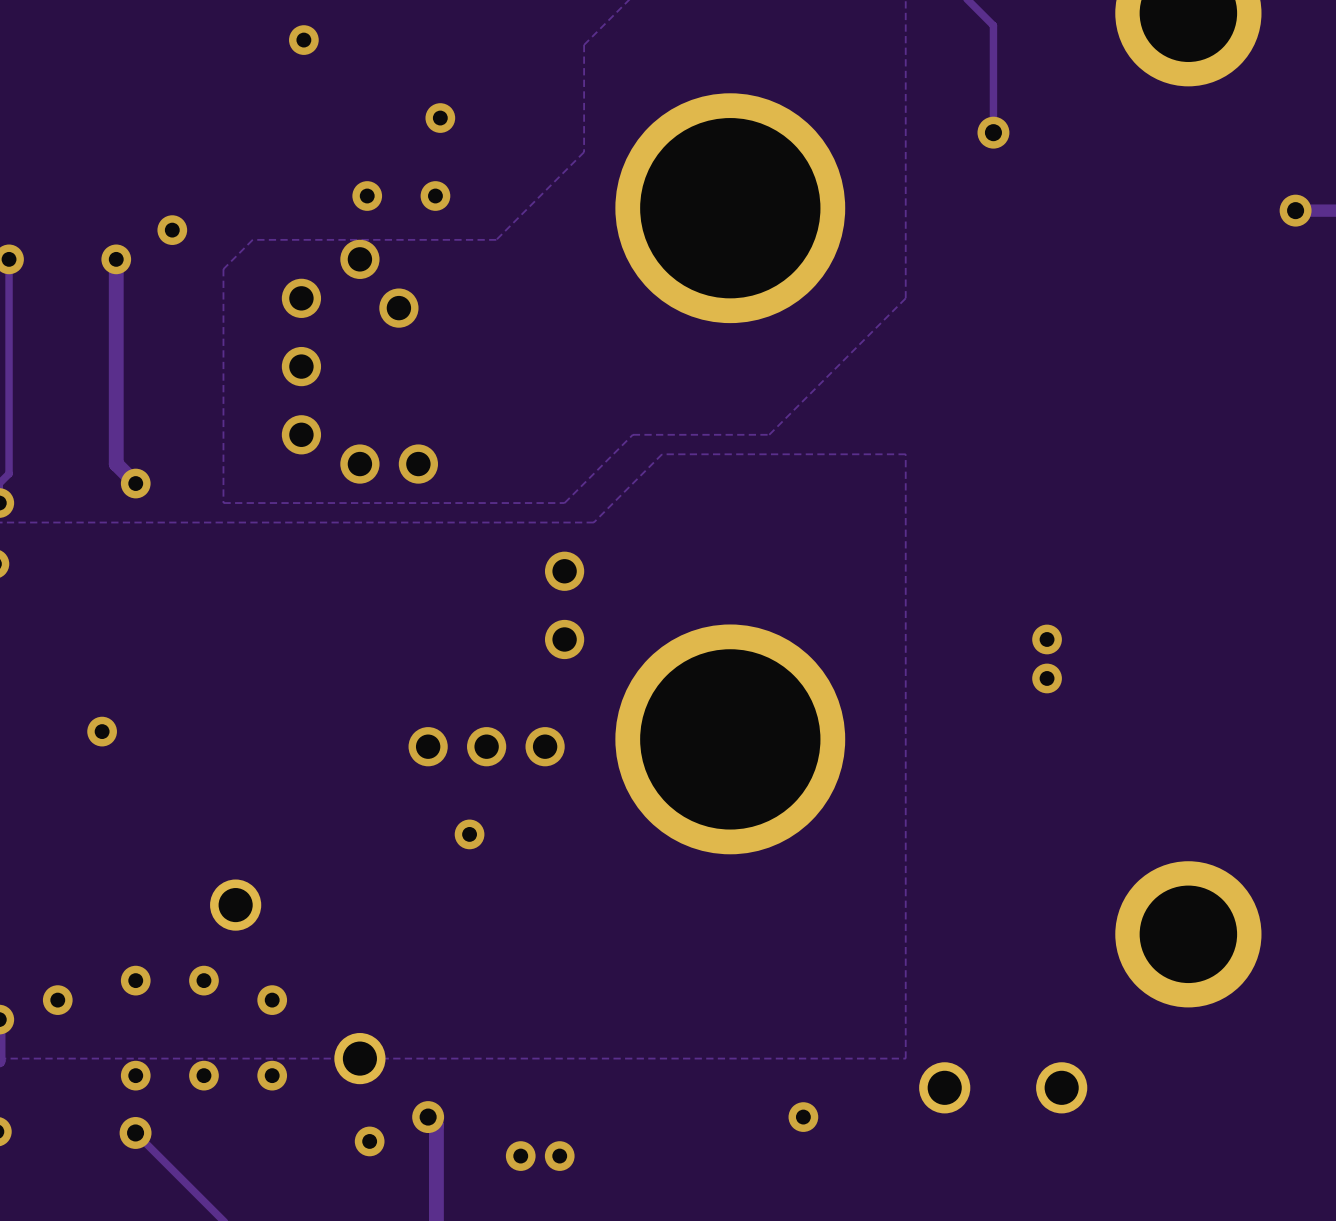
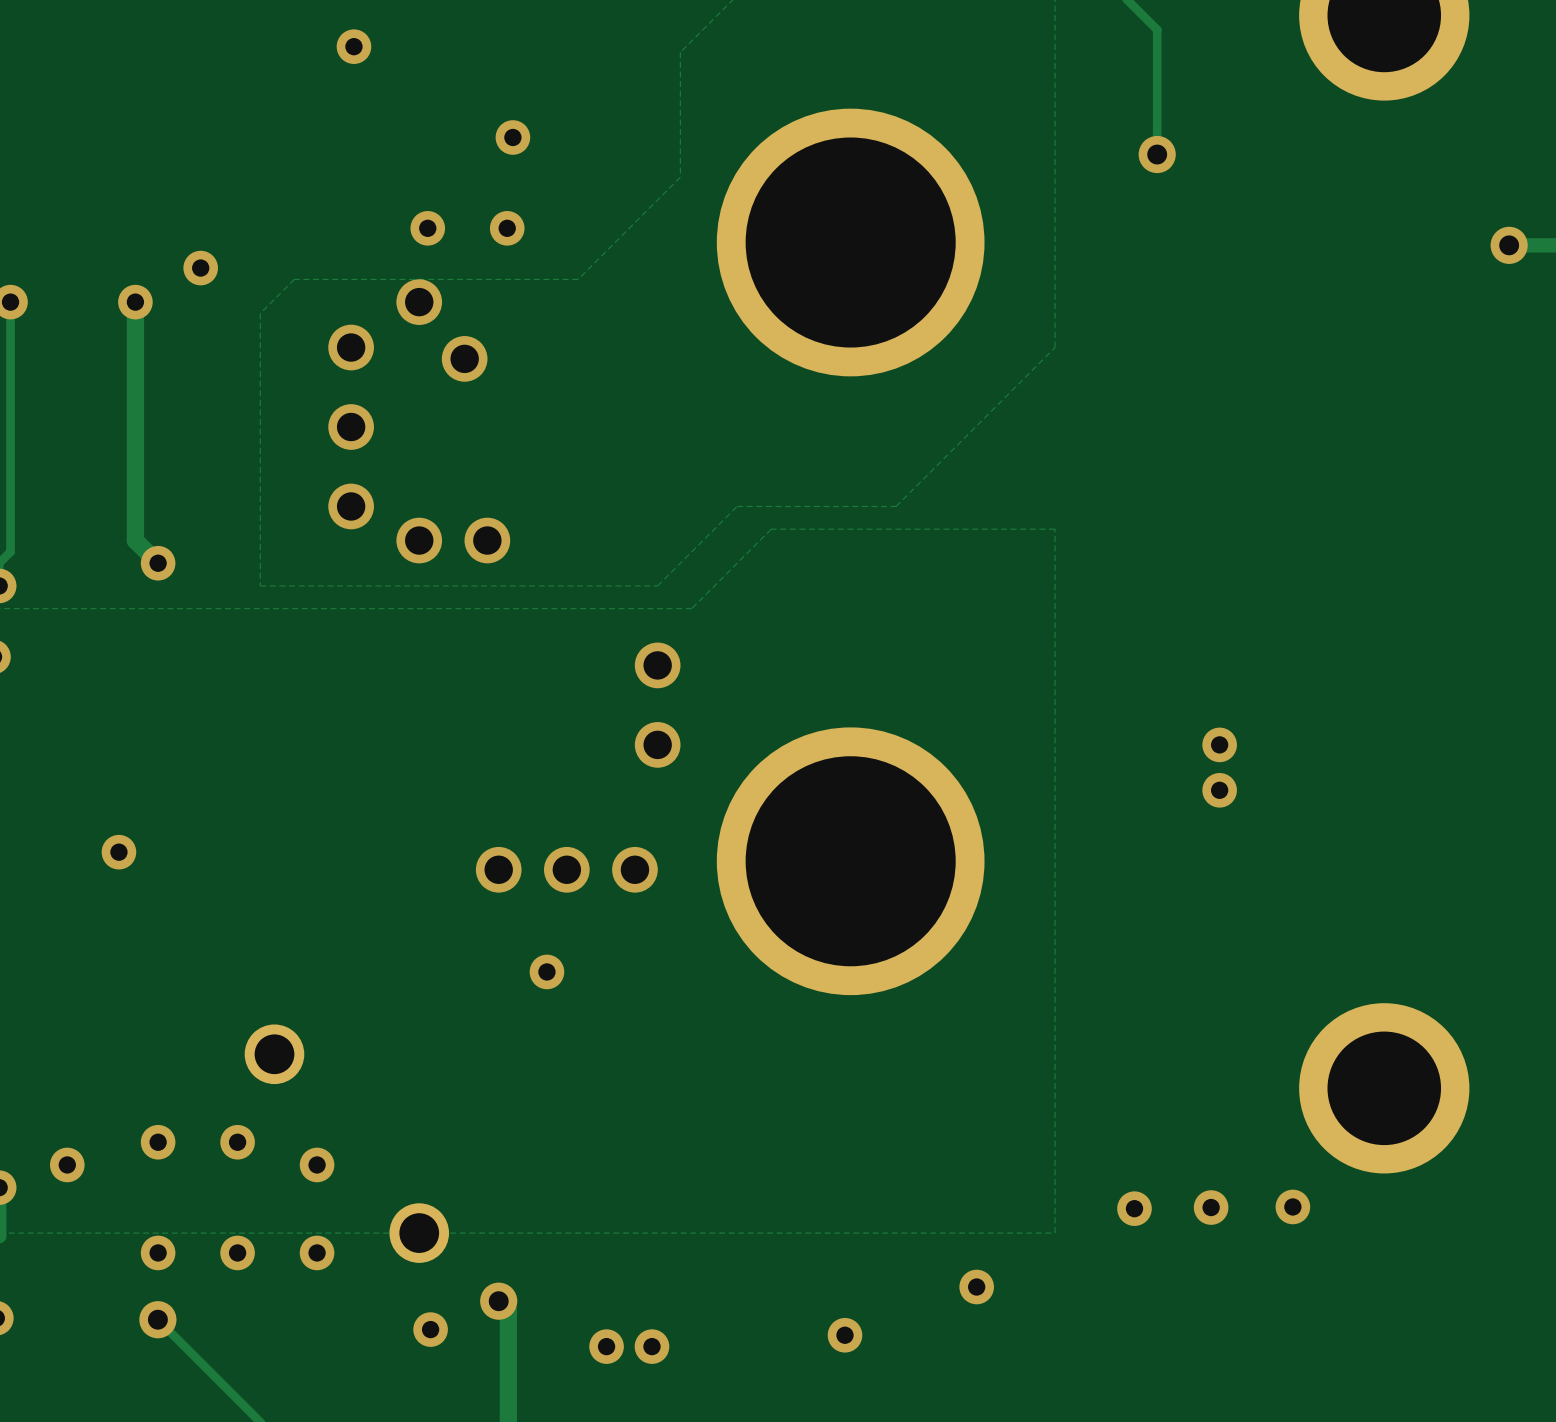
via: none -> (1211, 1207)
via: none -> (1292, 1206)
via: none -> (1134, 1208)
part: (944, 1087) -> none
part: (1061, 1087) -> none
via position: (803, 1117) -> (976, 1287)
via: none -> (844, 1335)

